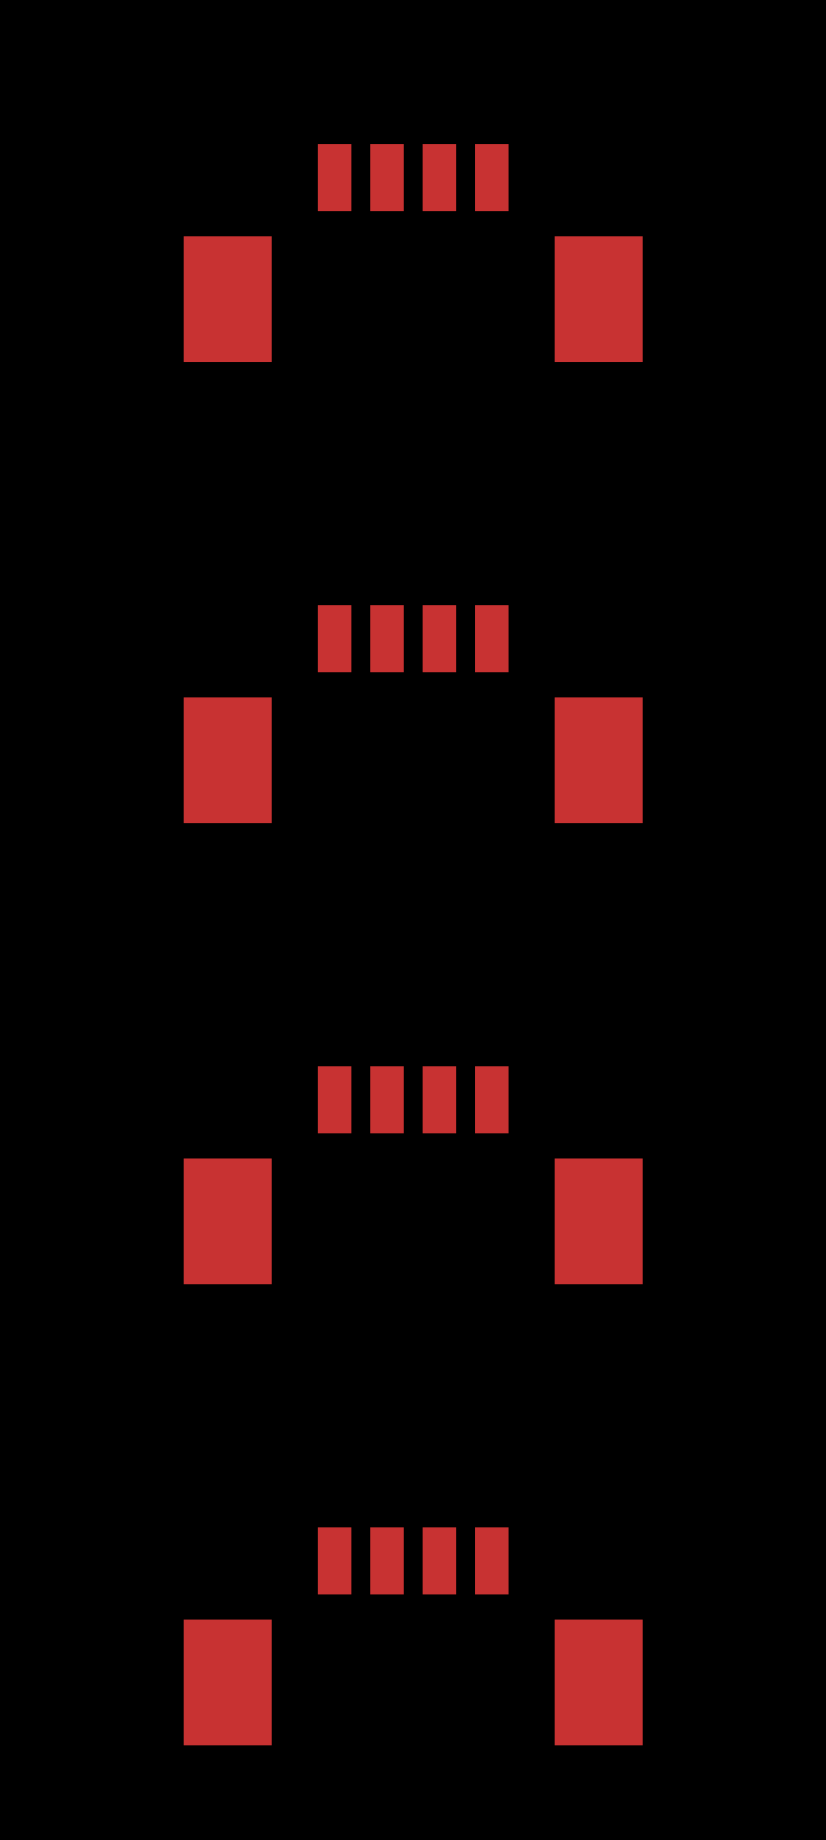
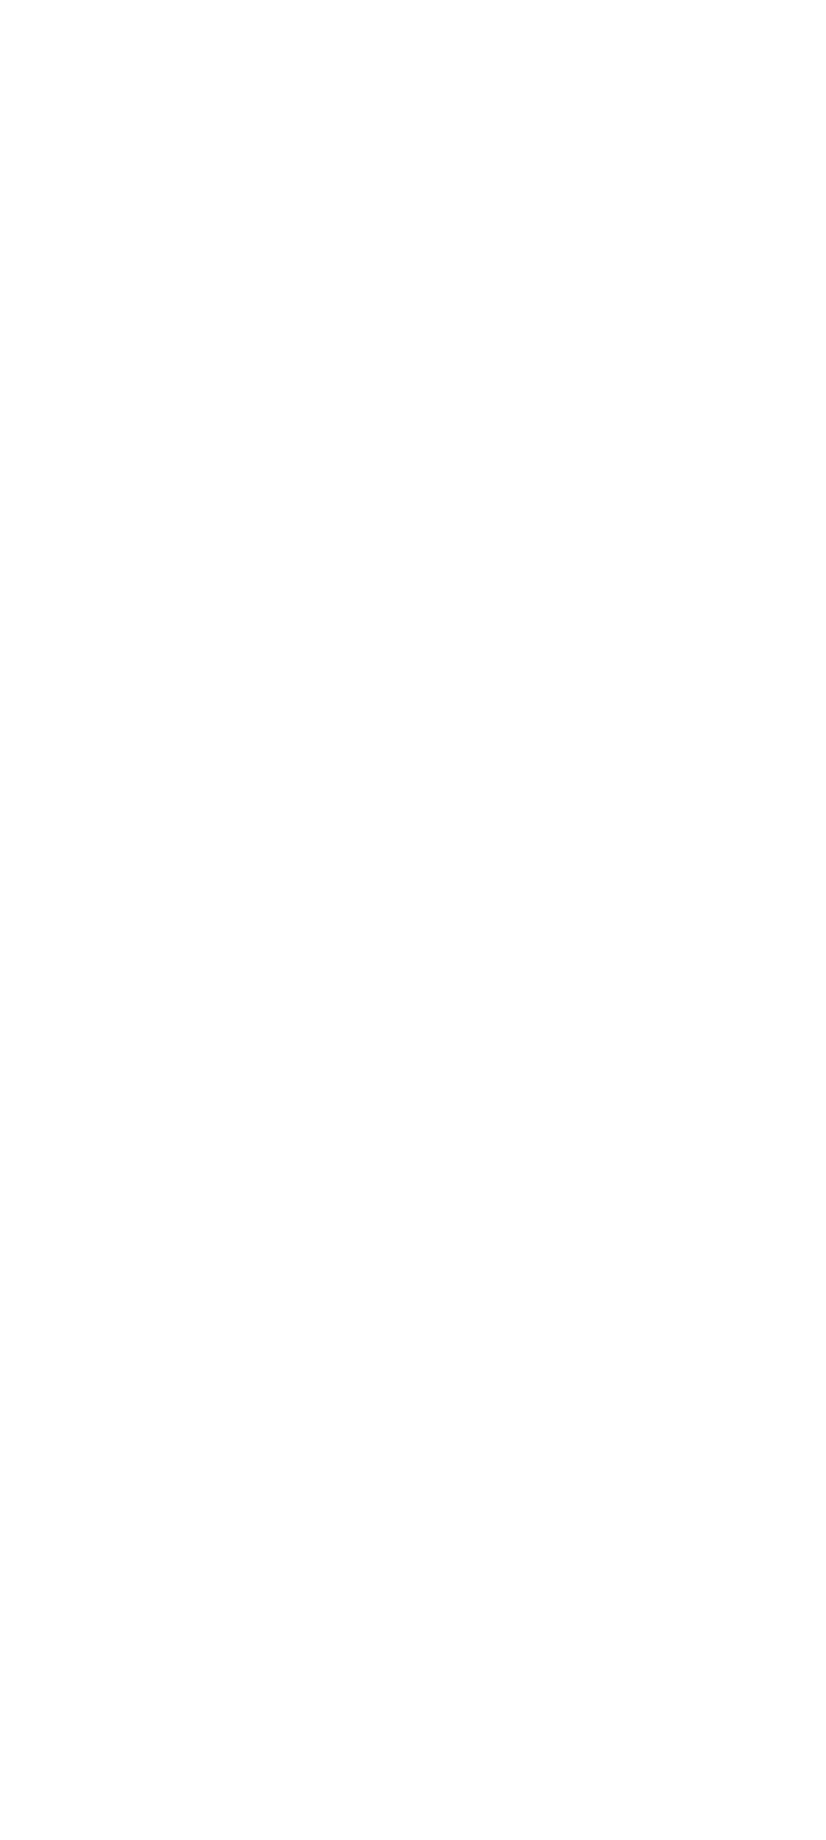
part: (413, 253) -> none
part: (413, 714) -> none
part: (413, 1175) -> none
part: (413, 1636) -> none

